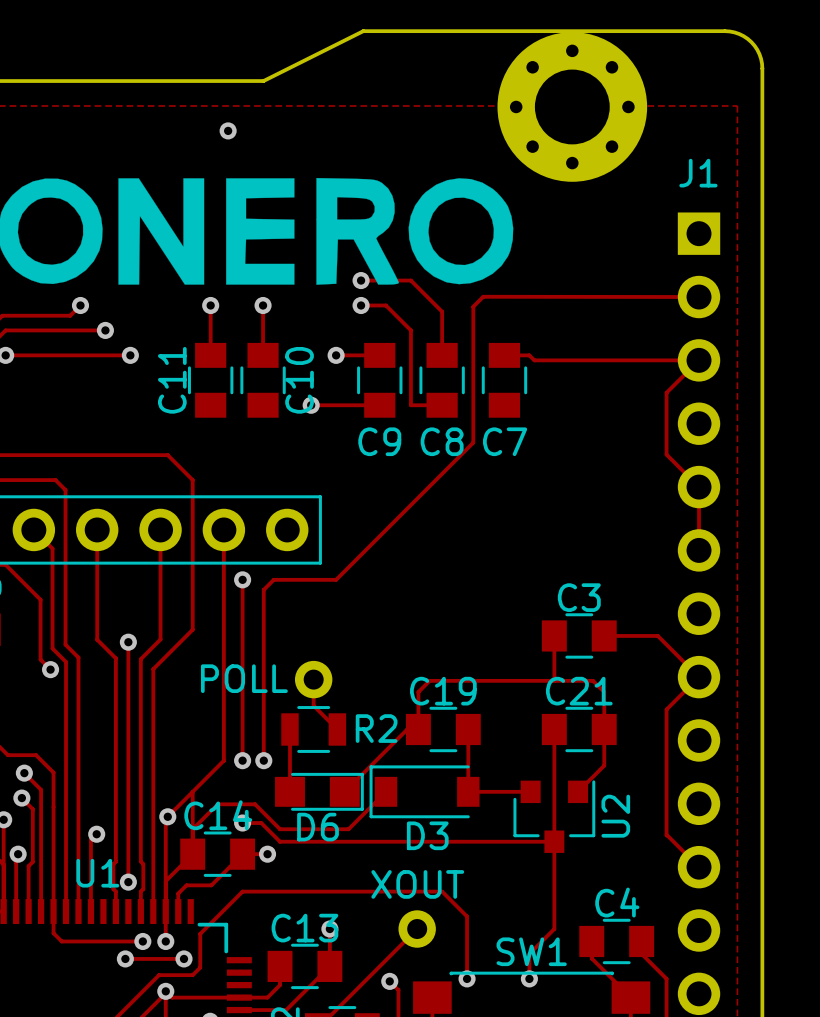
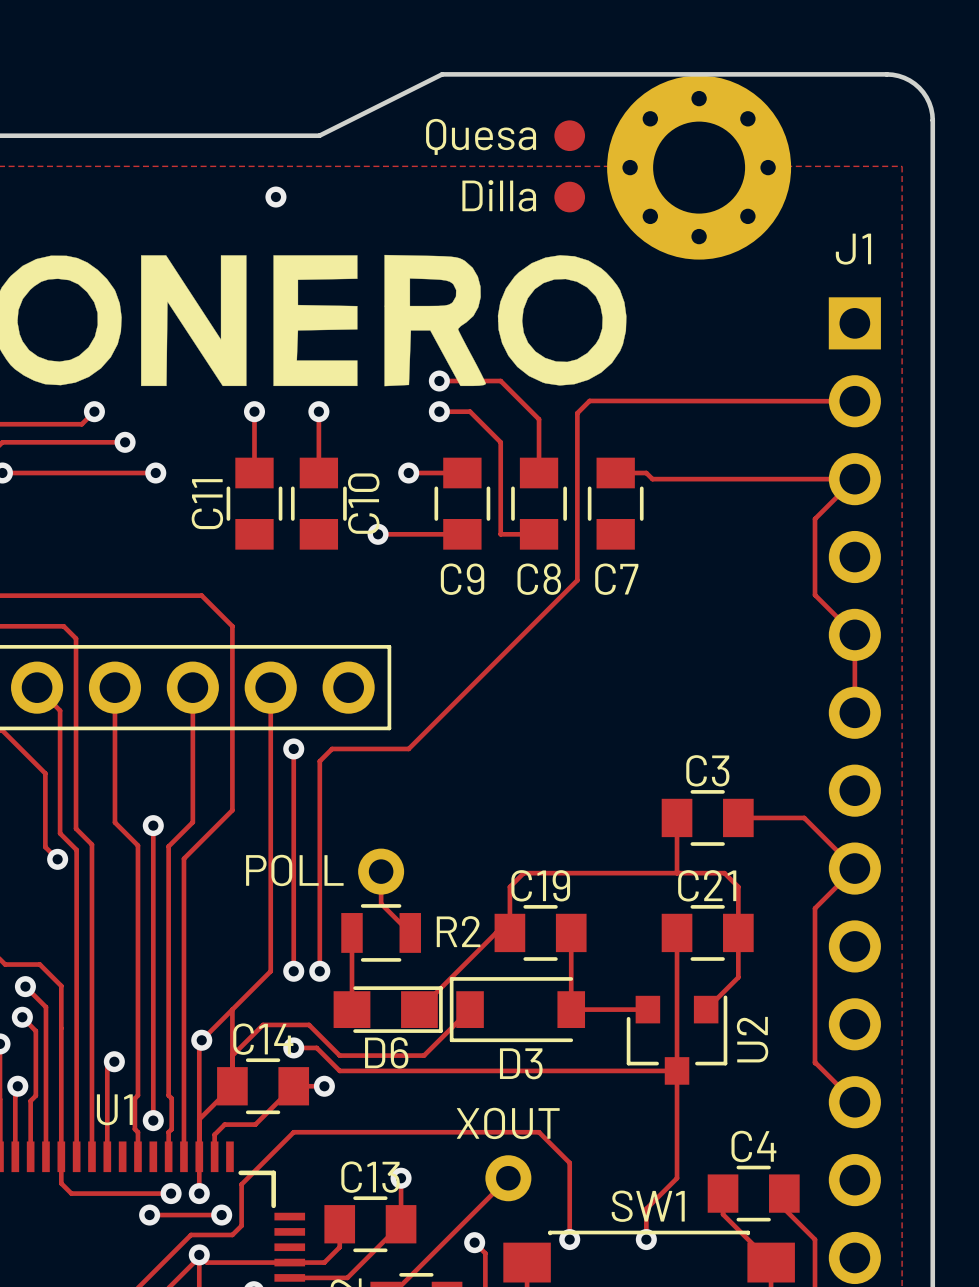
text: none -> Quesa (481, 136)
part: none -> (569, 135)
text: none -> Dilla (499, 195)
part: none -> (569, 197)

